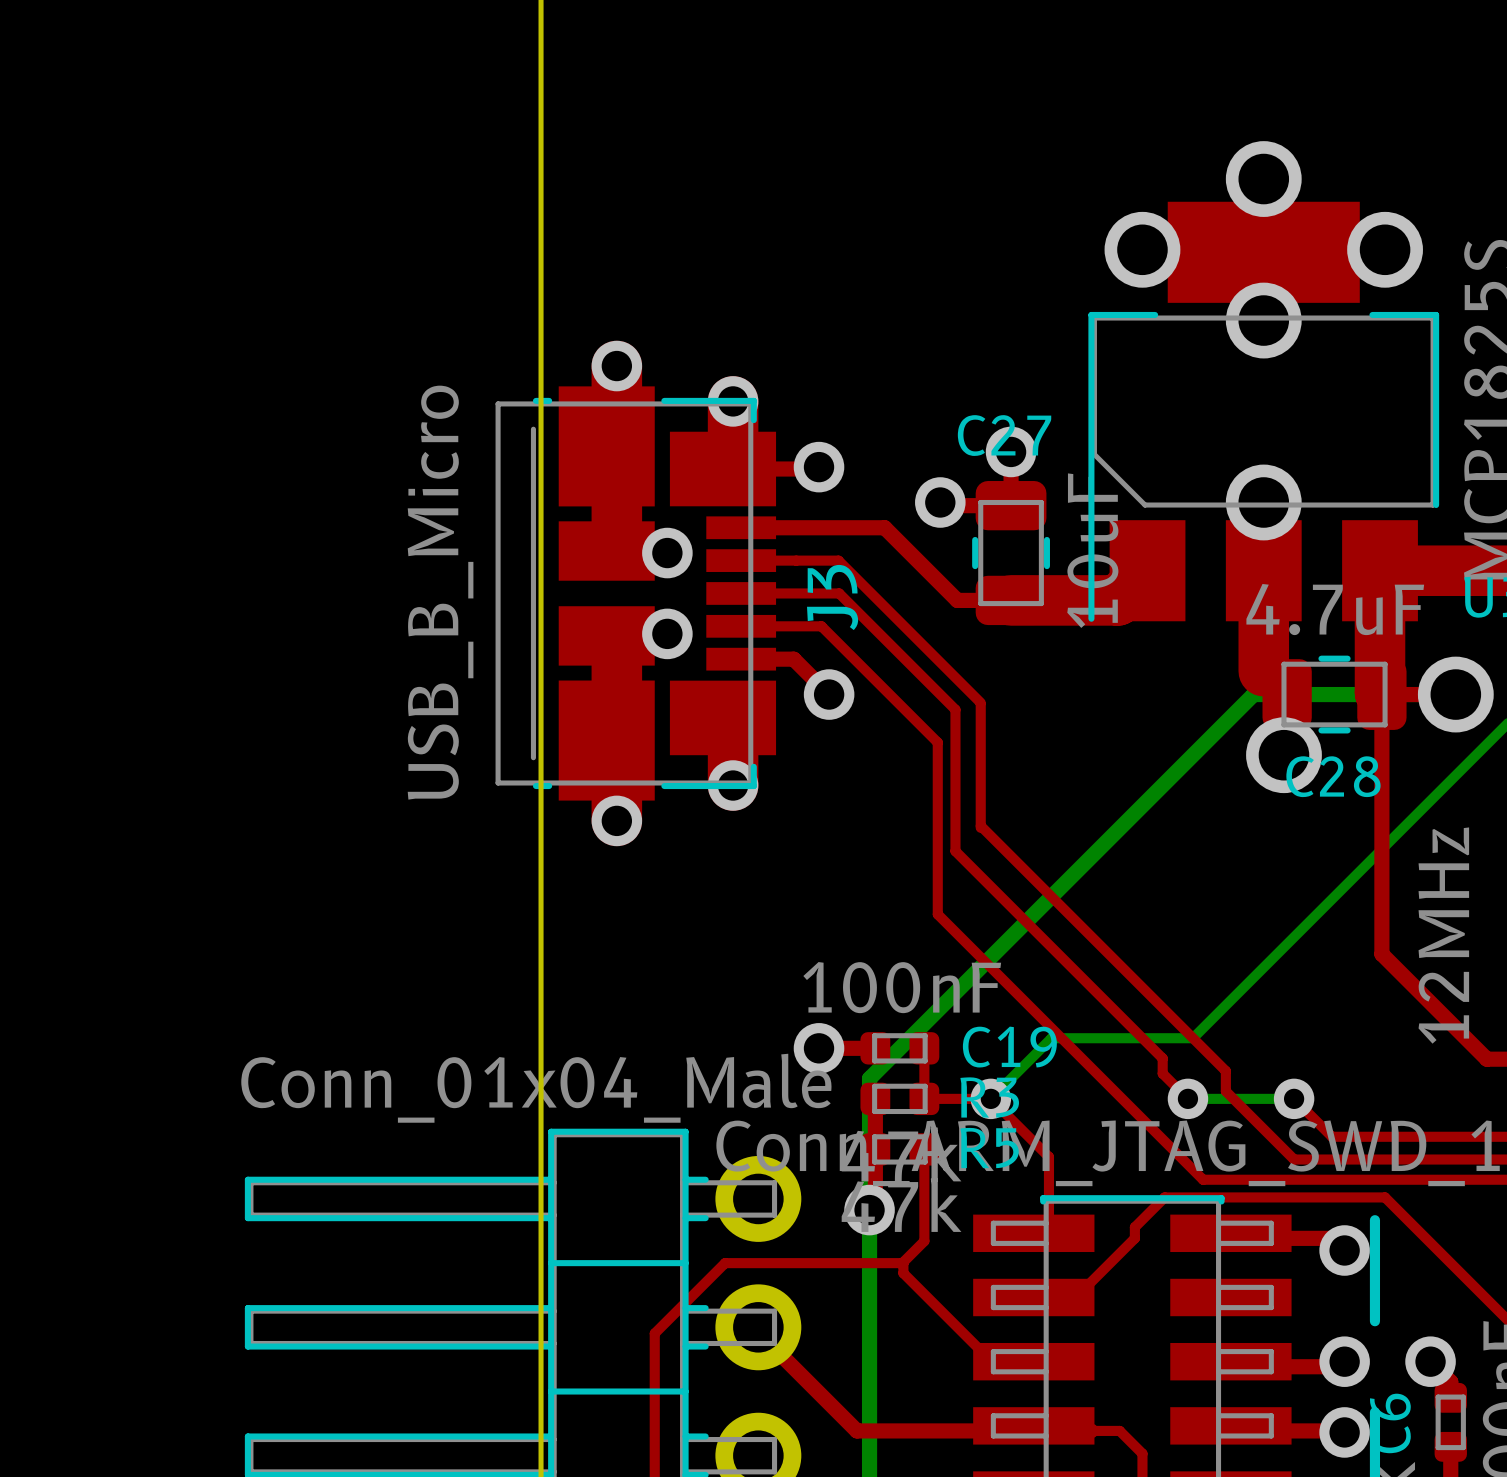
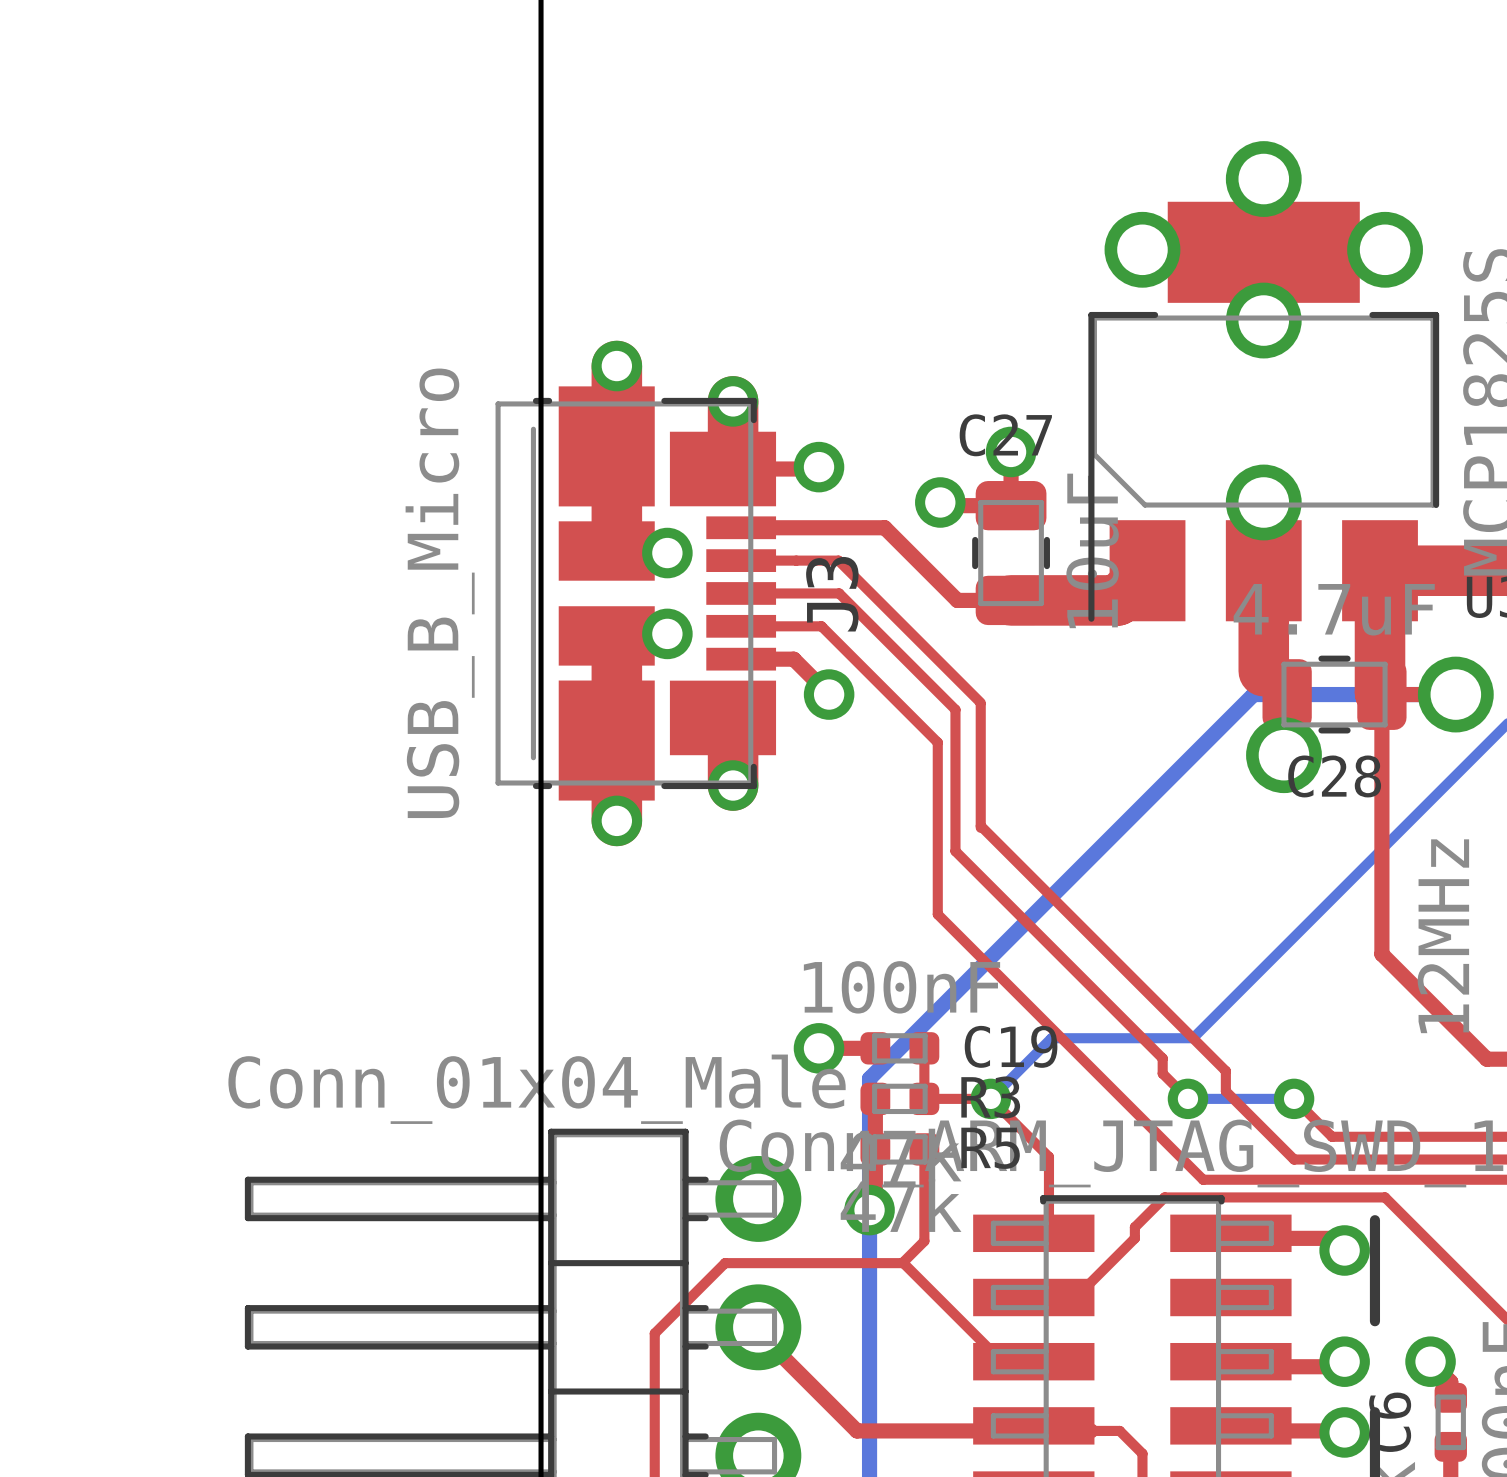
top track: (903, 1263) (903, 1273) (991, 1361) (1033, 1361) -> (903, 1263) (1007, 1366)

